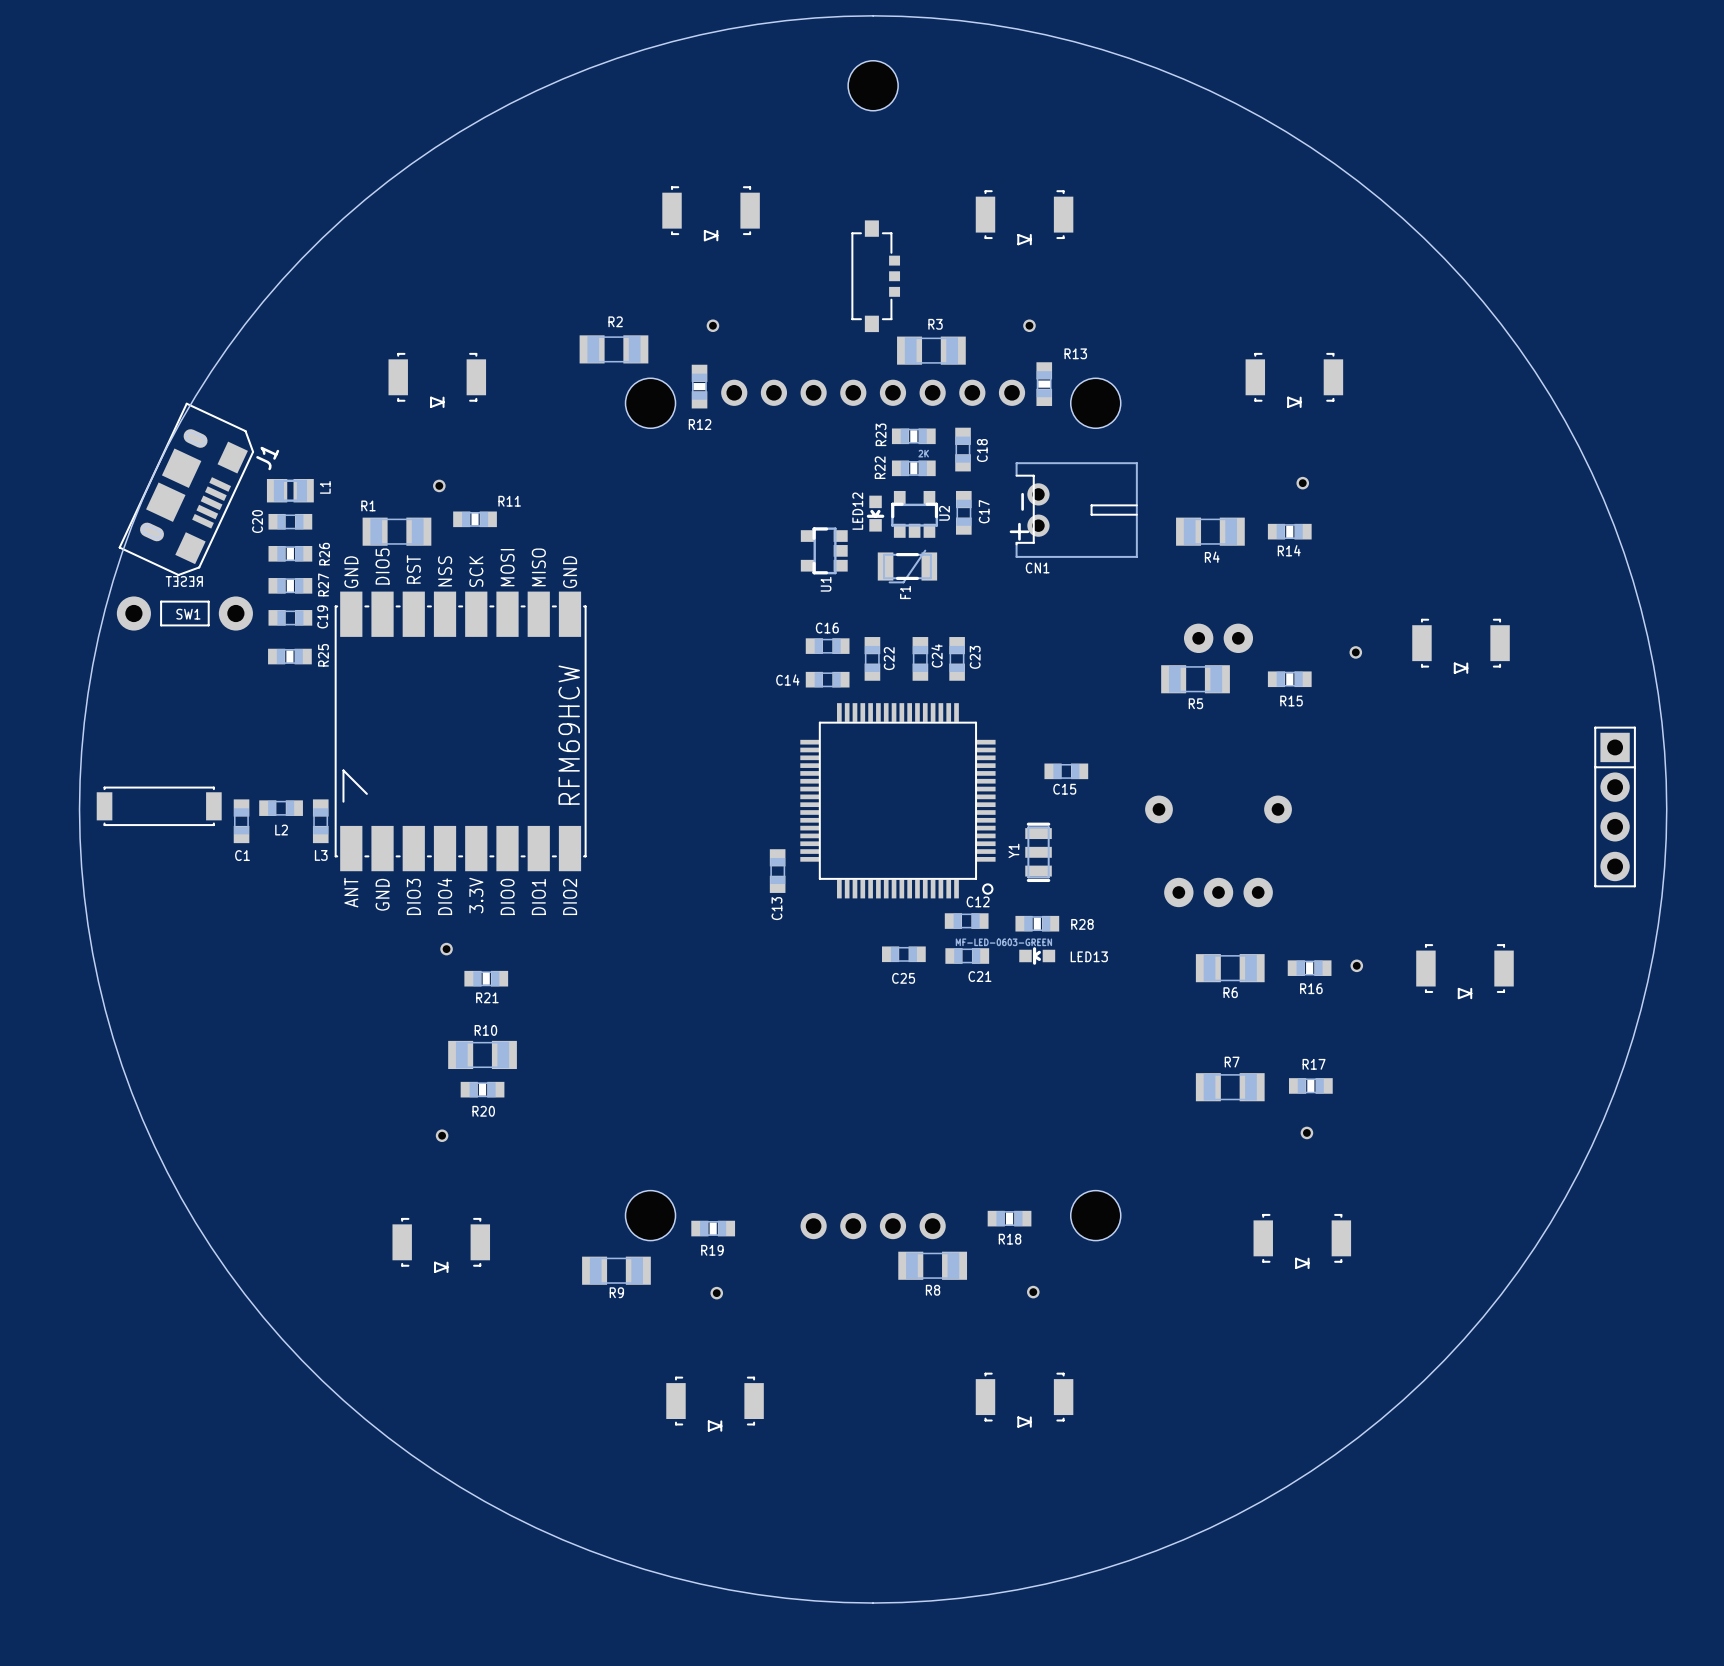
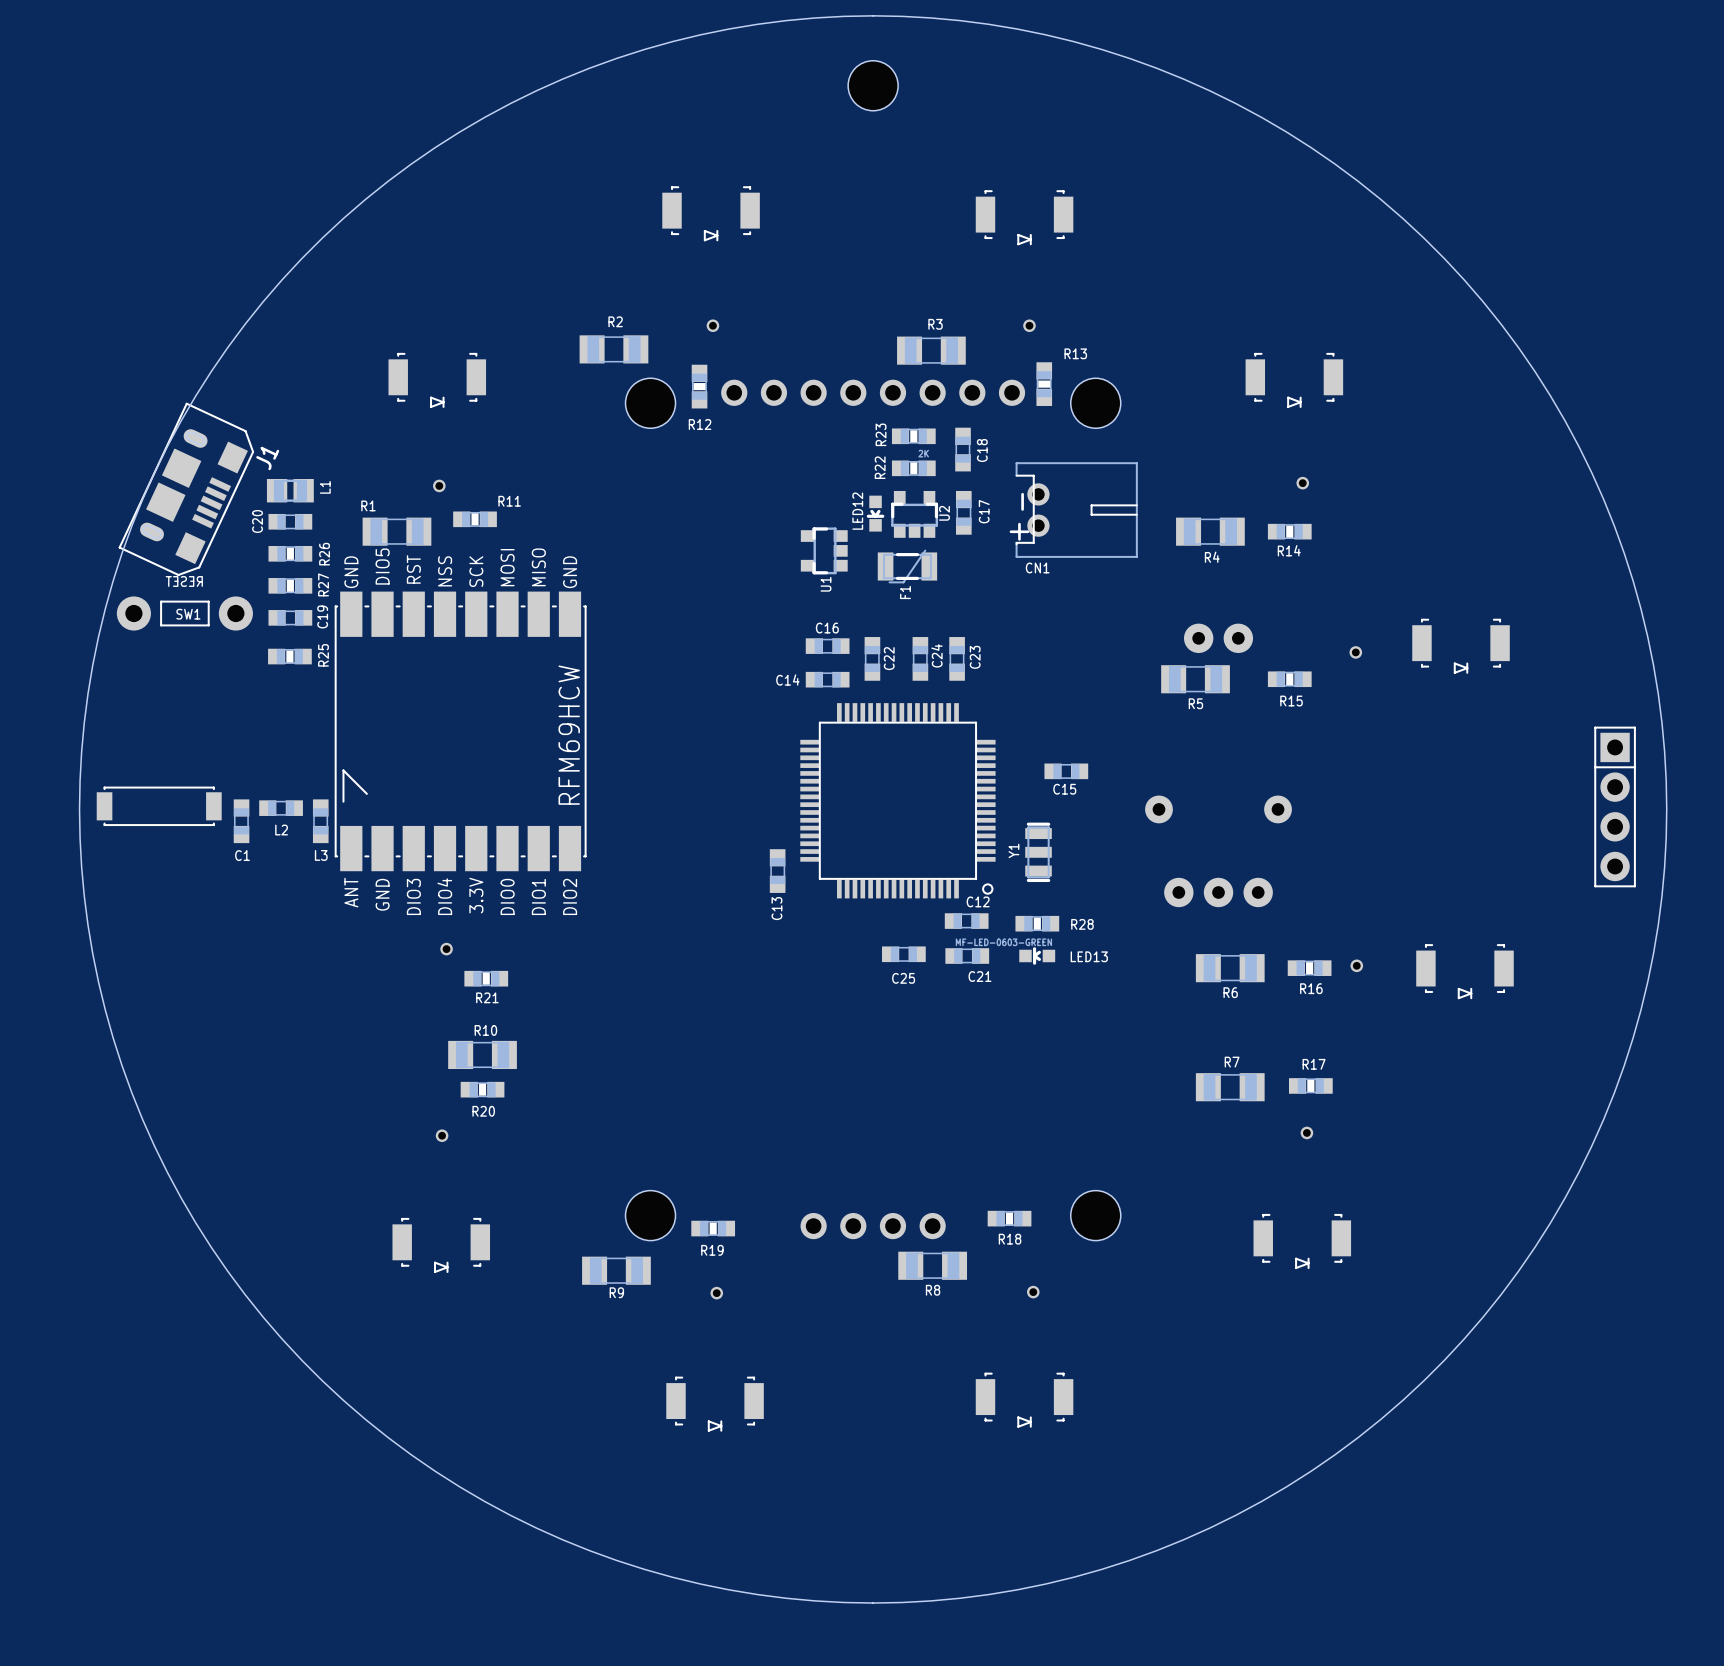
part: (875, 276) -> none

